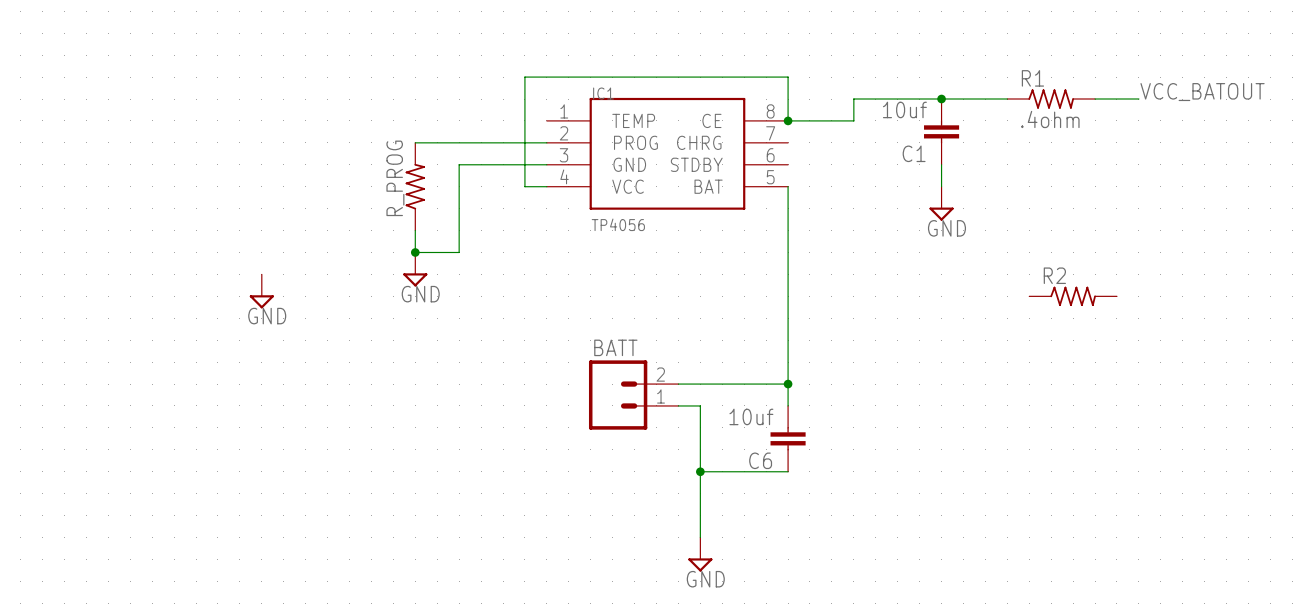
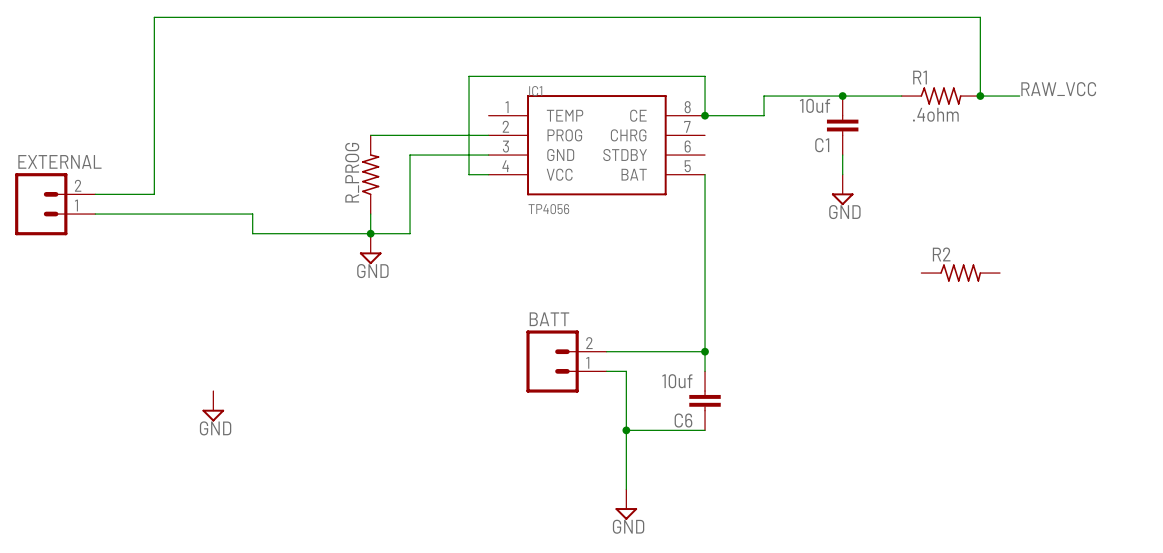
label: VCC_BATOUT (1202, 92) -> RAW_VCC (1058, 89)
wire: none -> (980, 96) (980, 17) (154, 17) (154, 194) (95, 194)
junction: none -> (980, 96)
EXTERNAL: none -> (55, 204)
wire: none -> (95, 214) (252, 214) (252, 233) (370, 233)
power symbol position: GND (261, 291) -> GND (213, 406)

